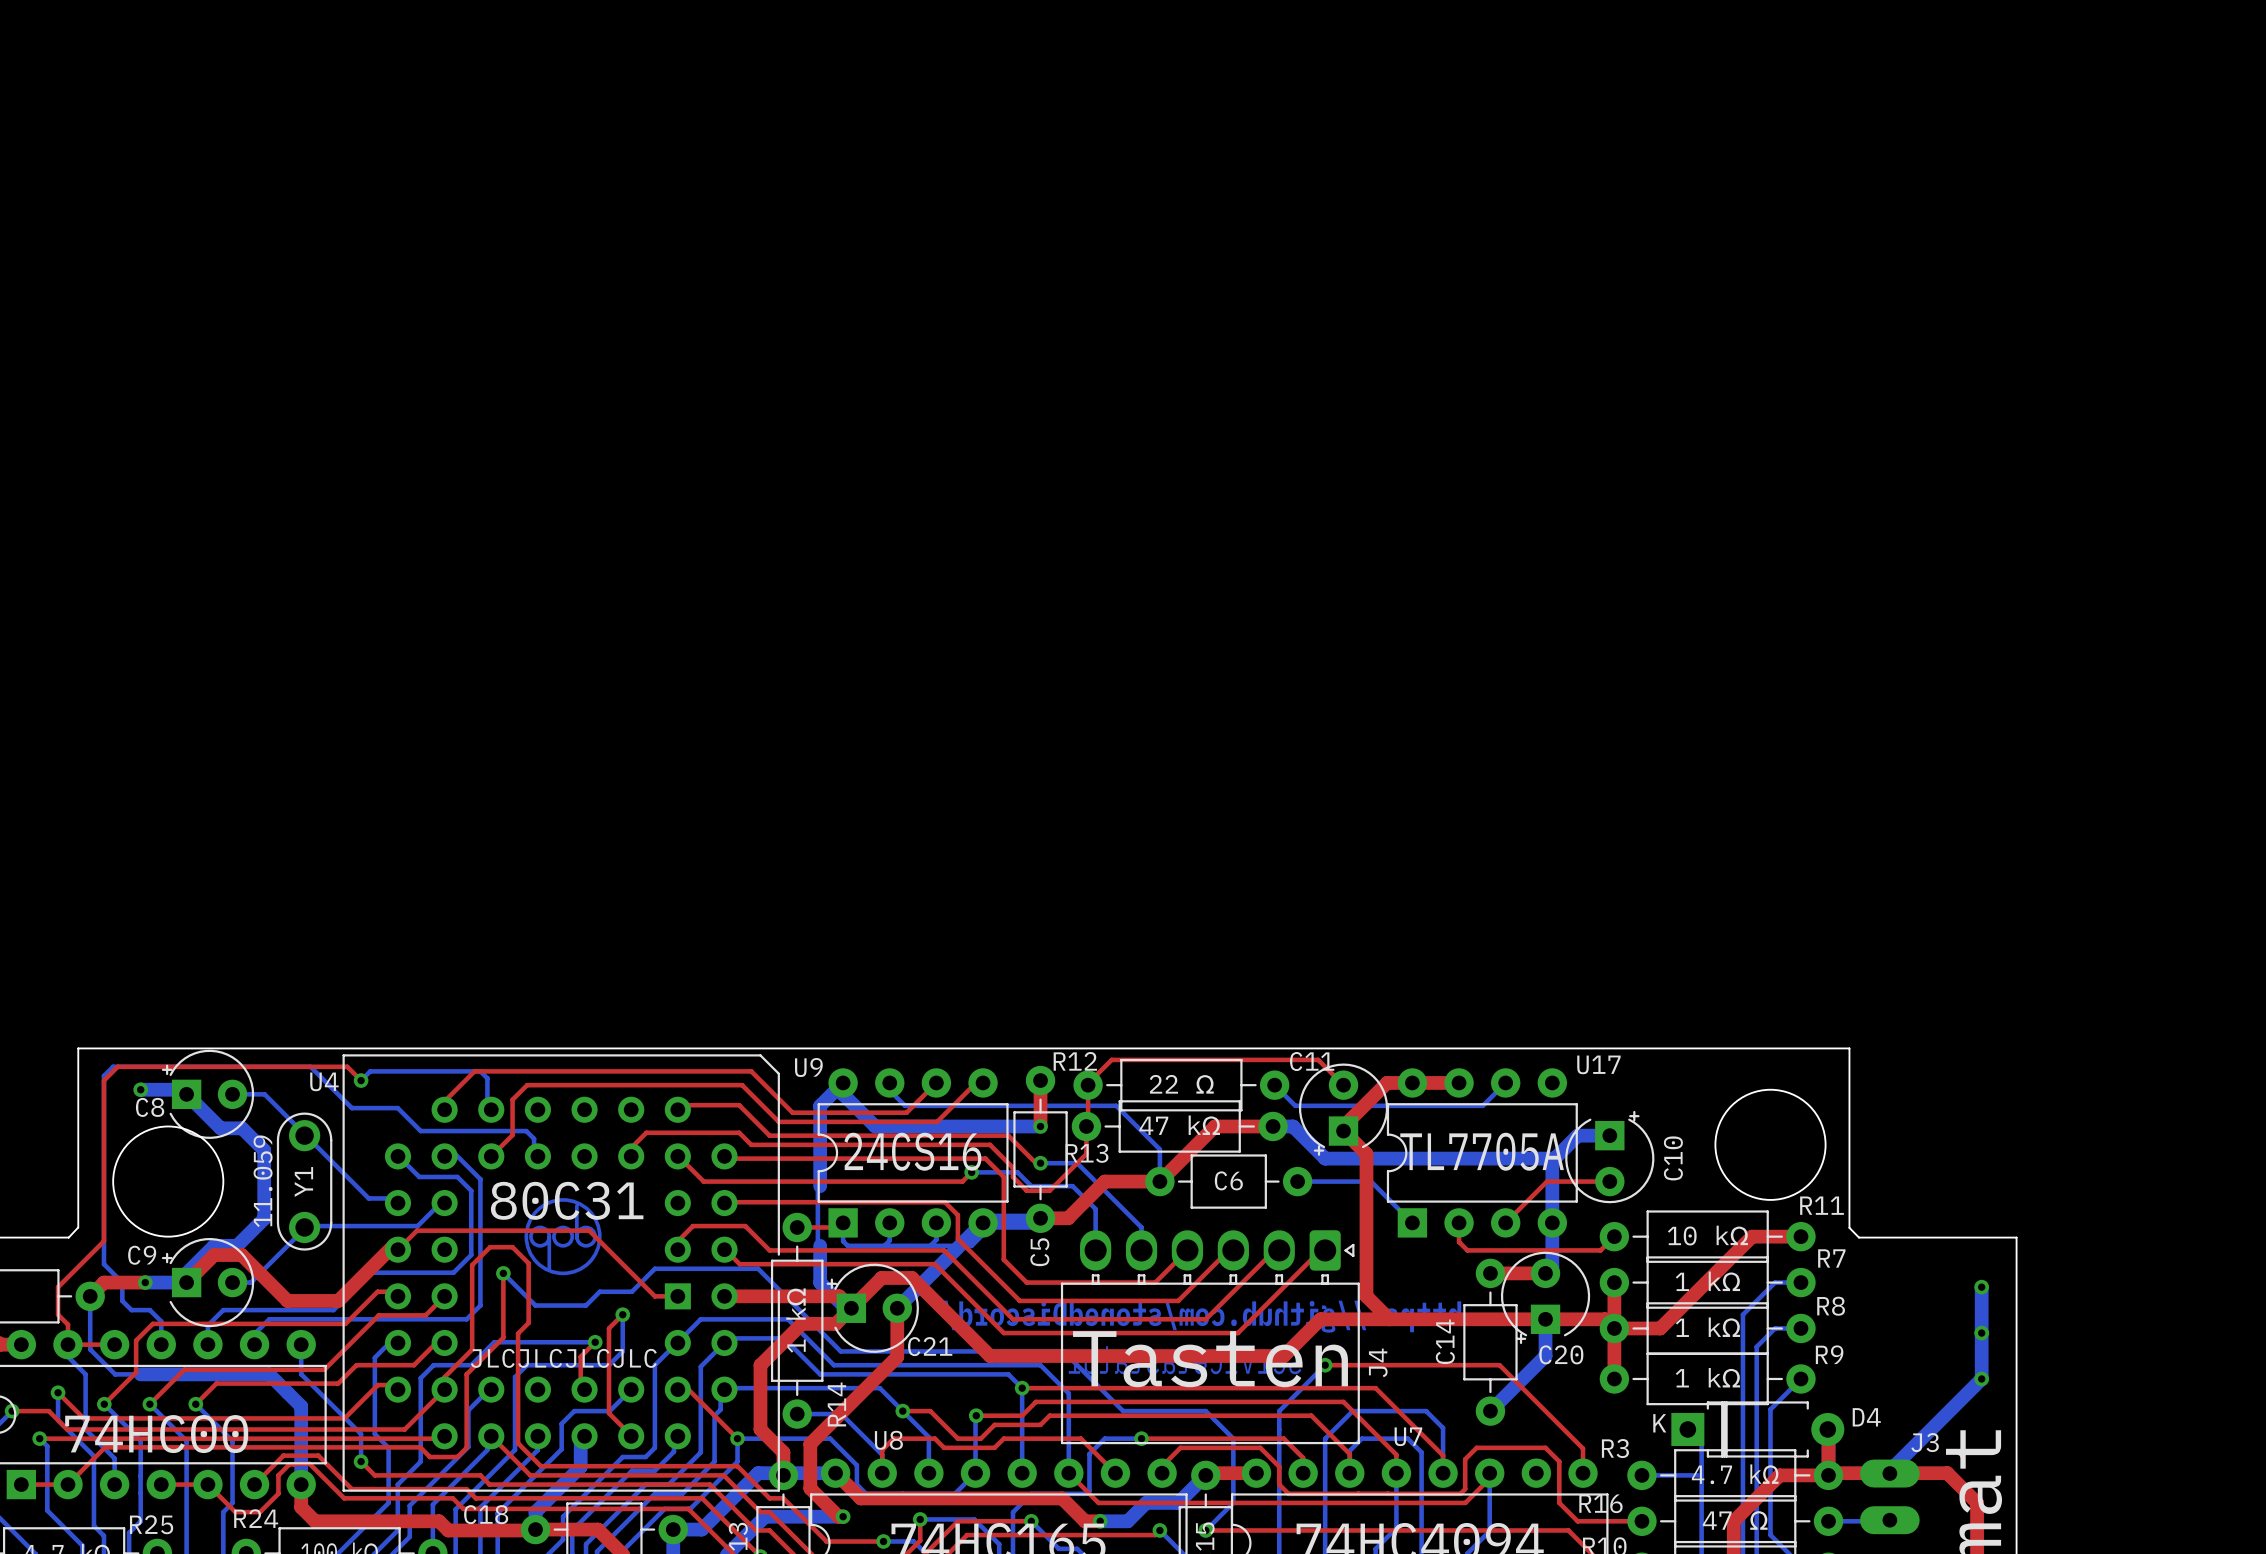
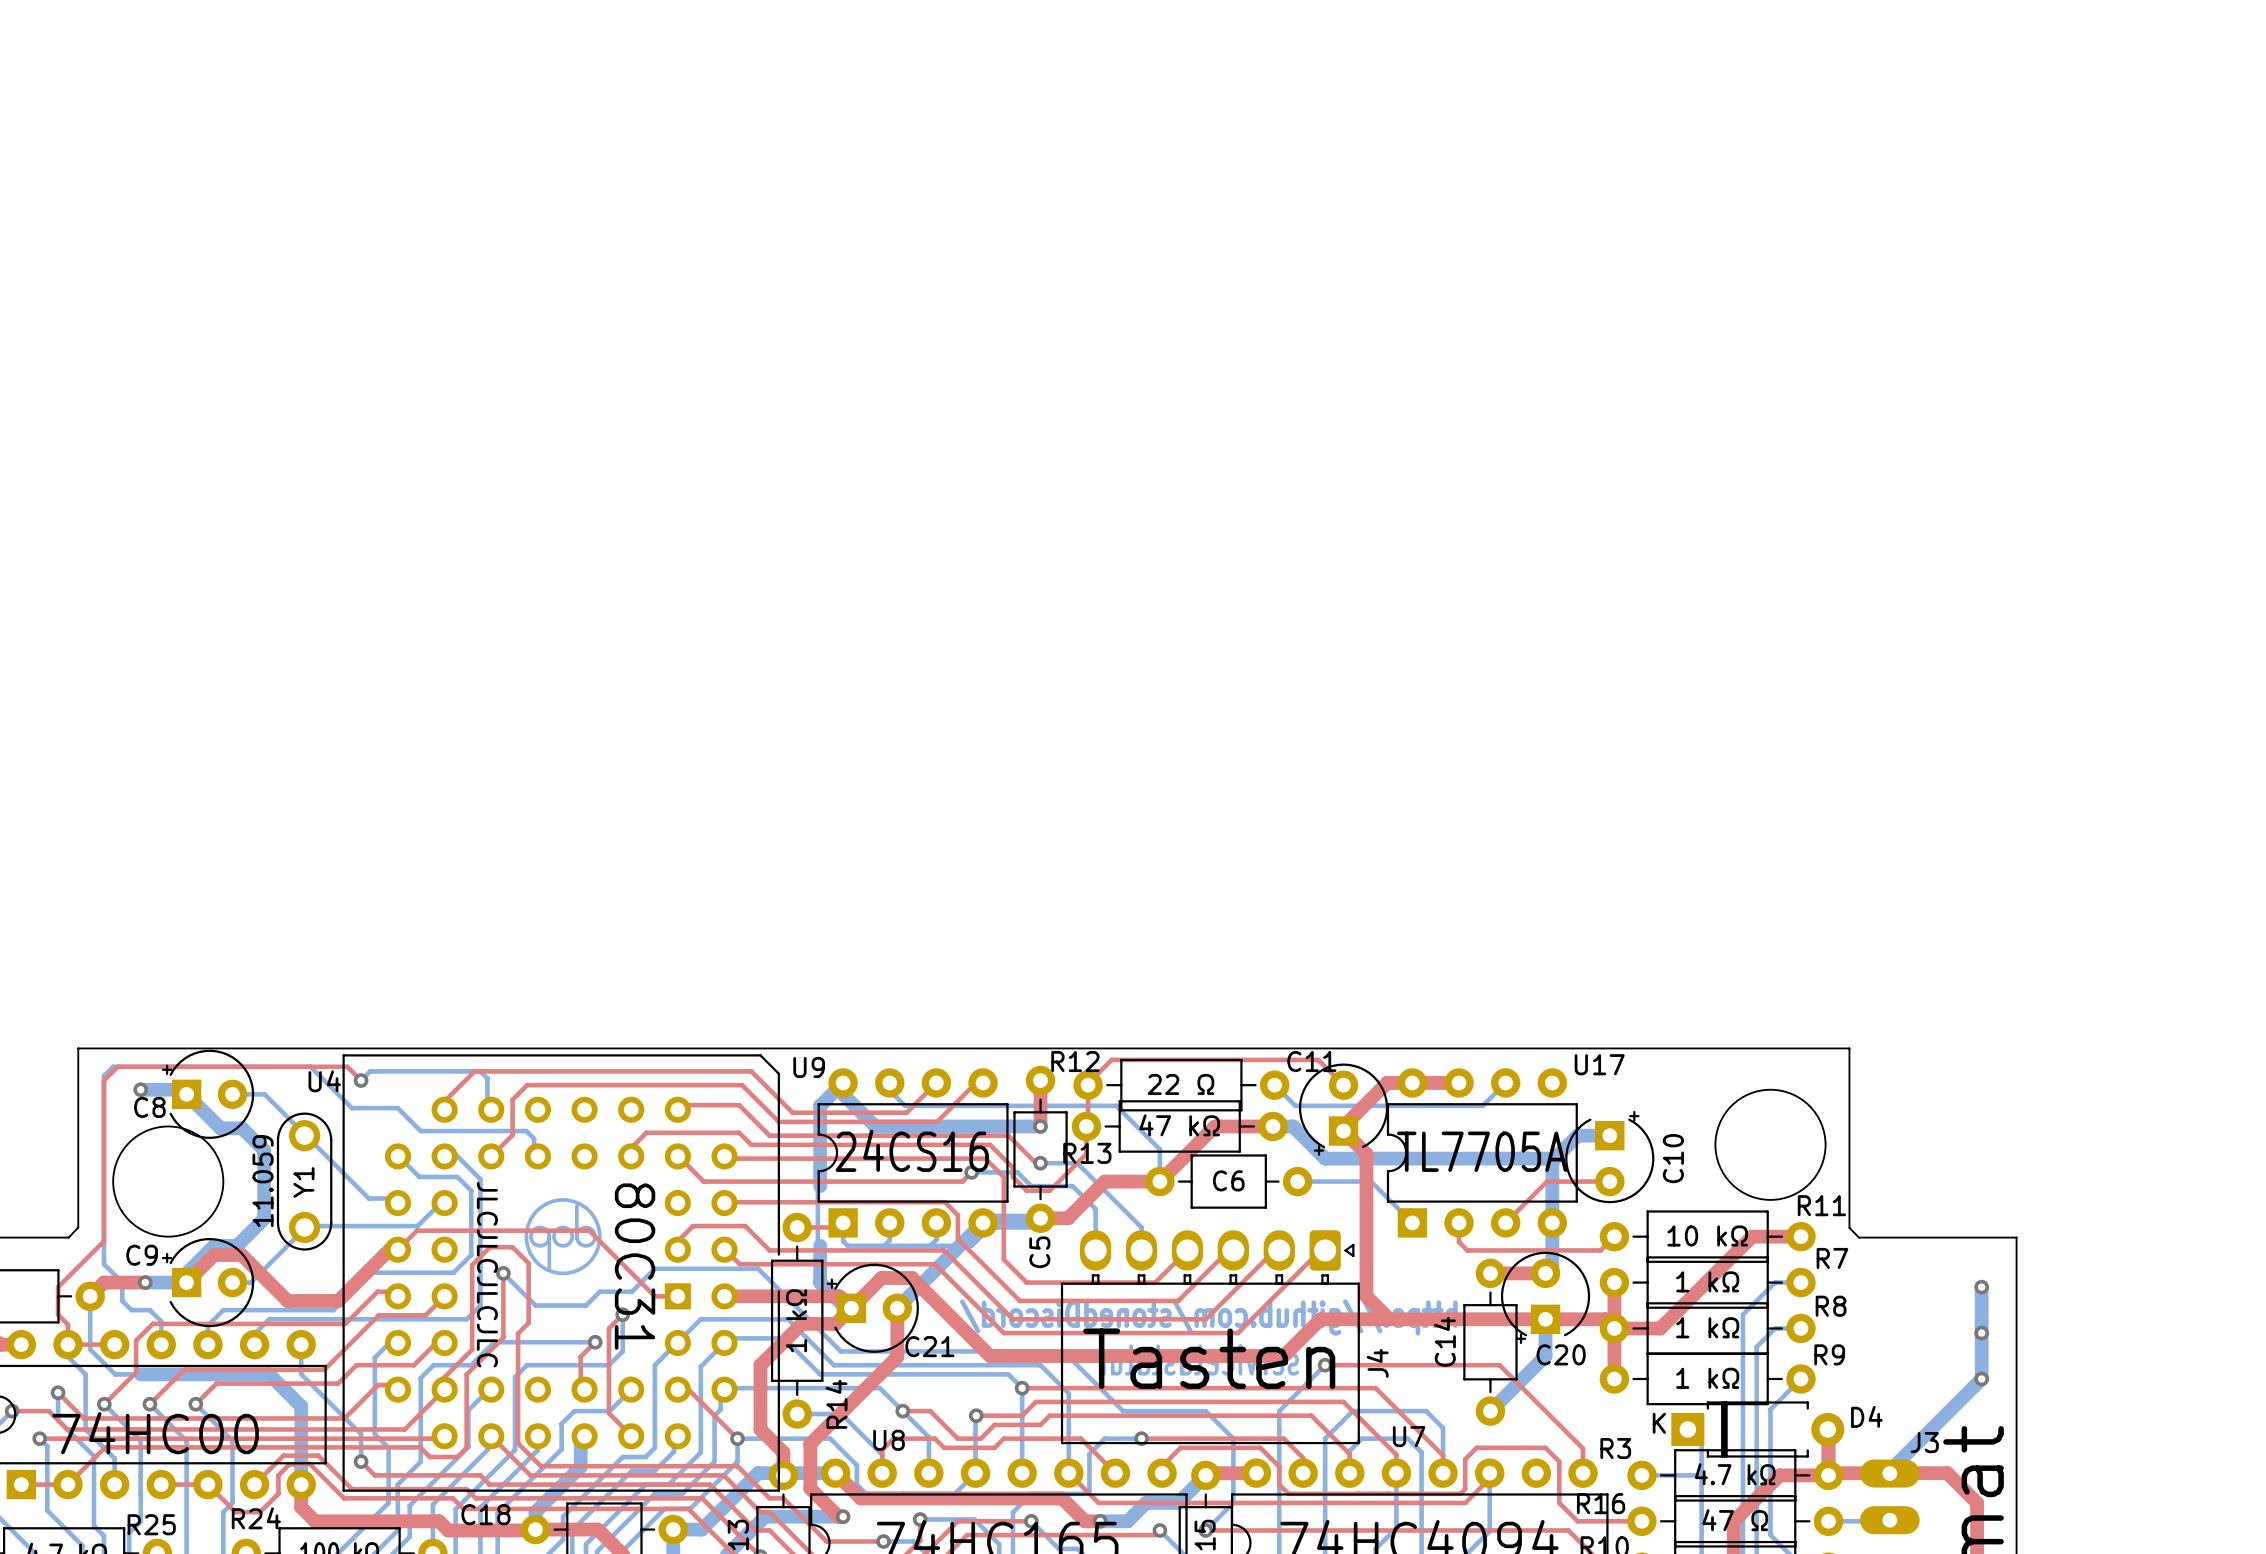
U4 value rotation: 0° (567, 1200) -> 90° clockwise (635, 1266)
text rotation: 0° (563, 1358) -> 90° clockwise (487, 1274)

